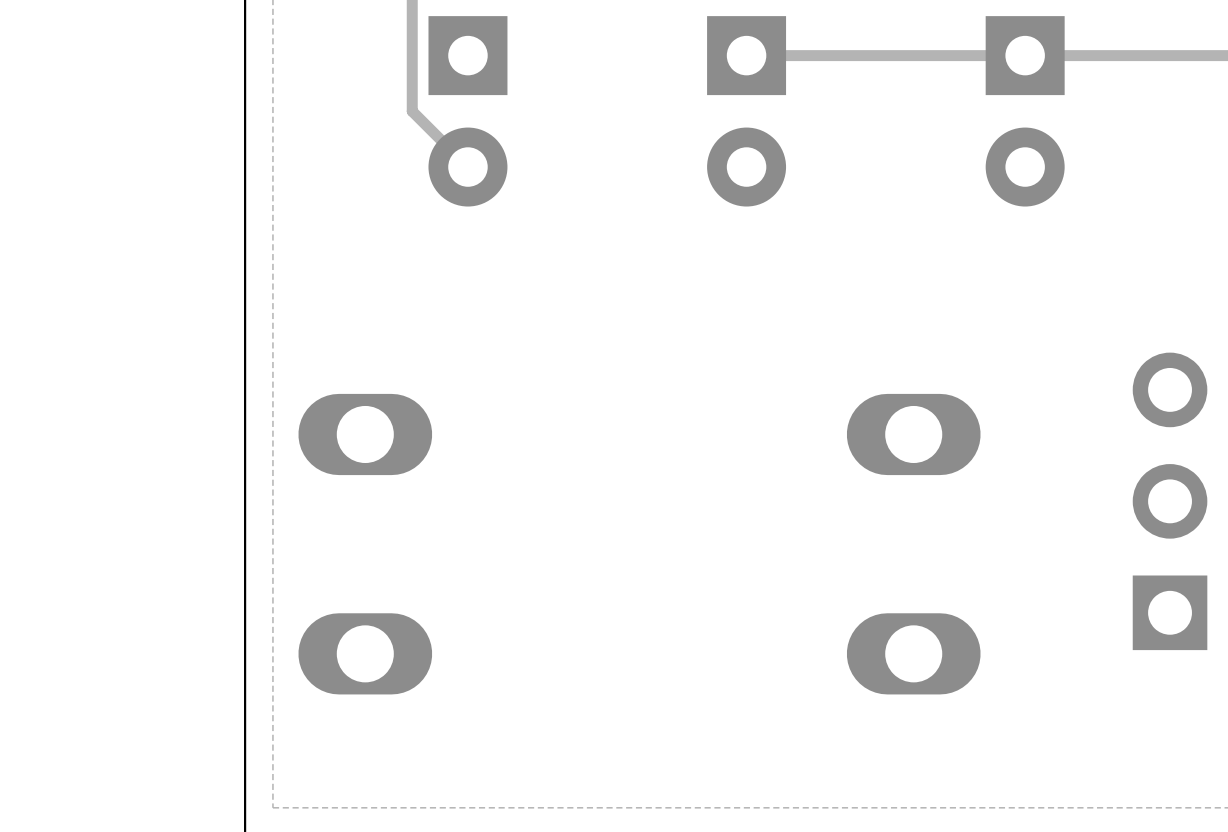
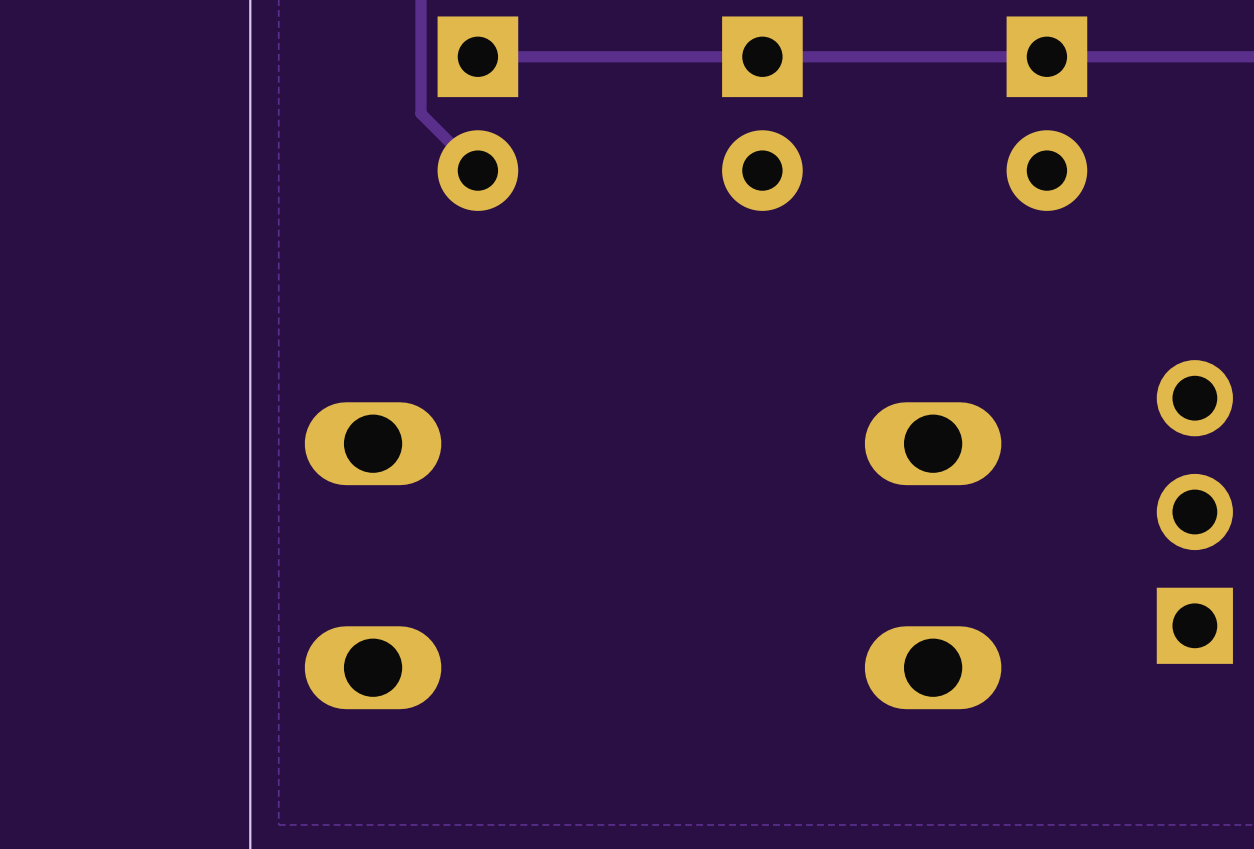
track: none -> (762, 56) (477, 56)

